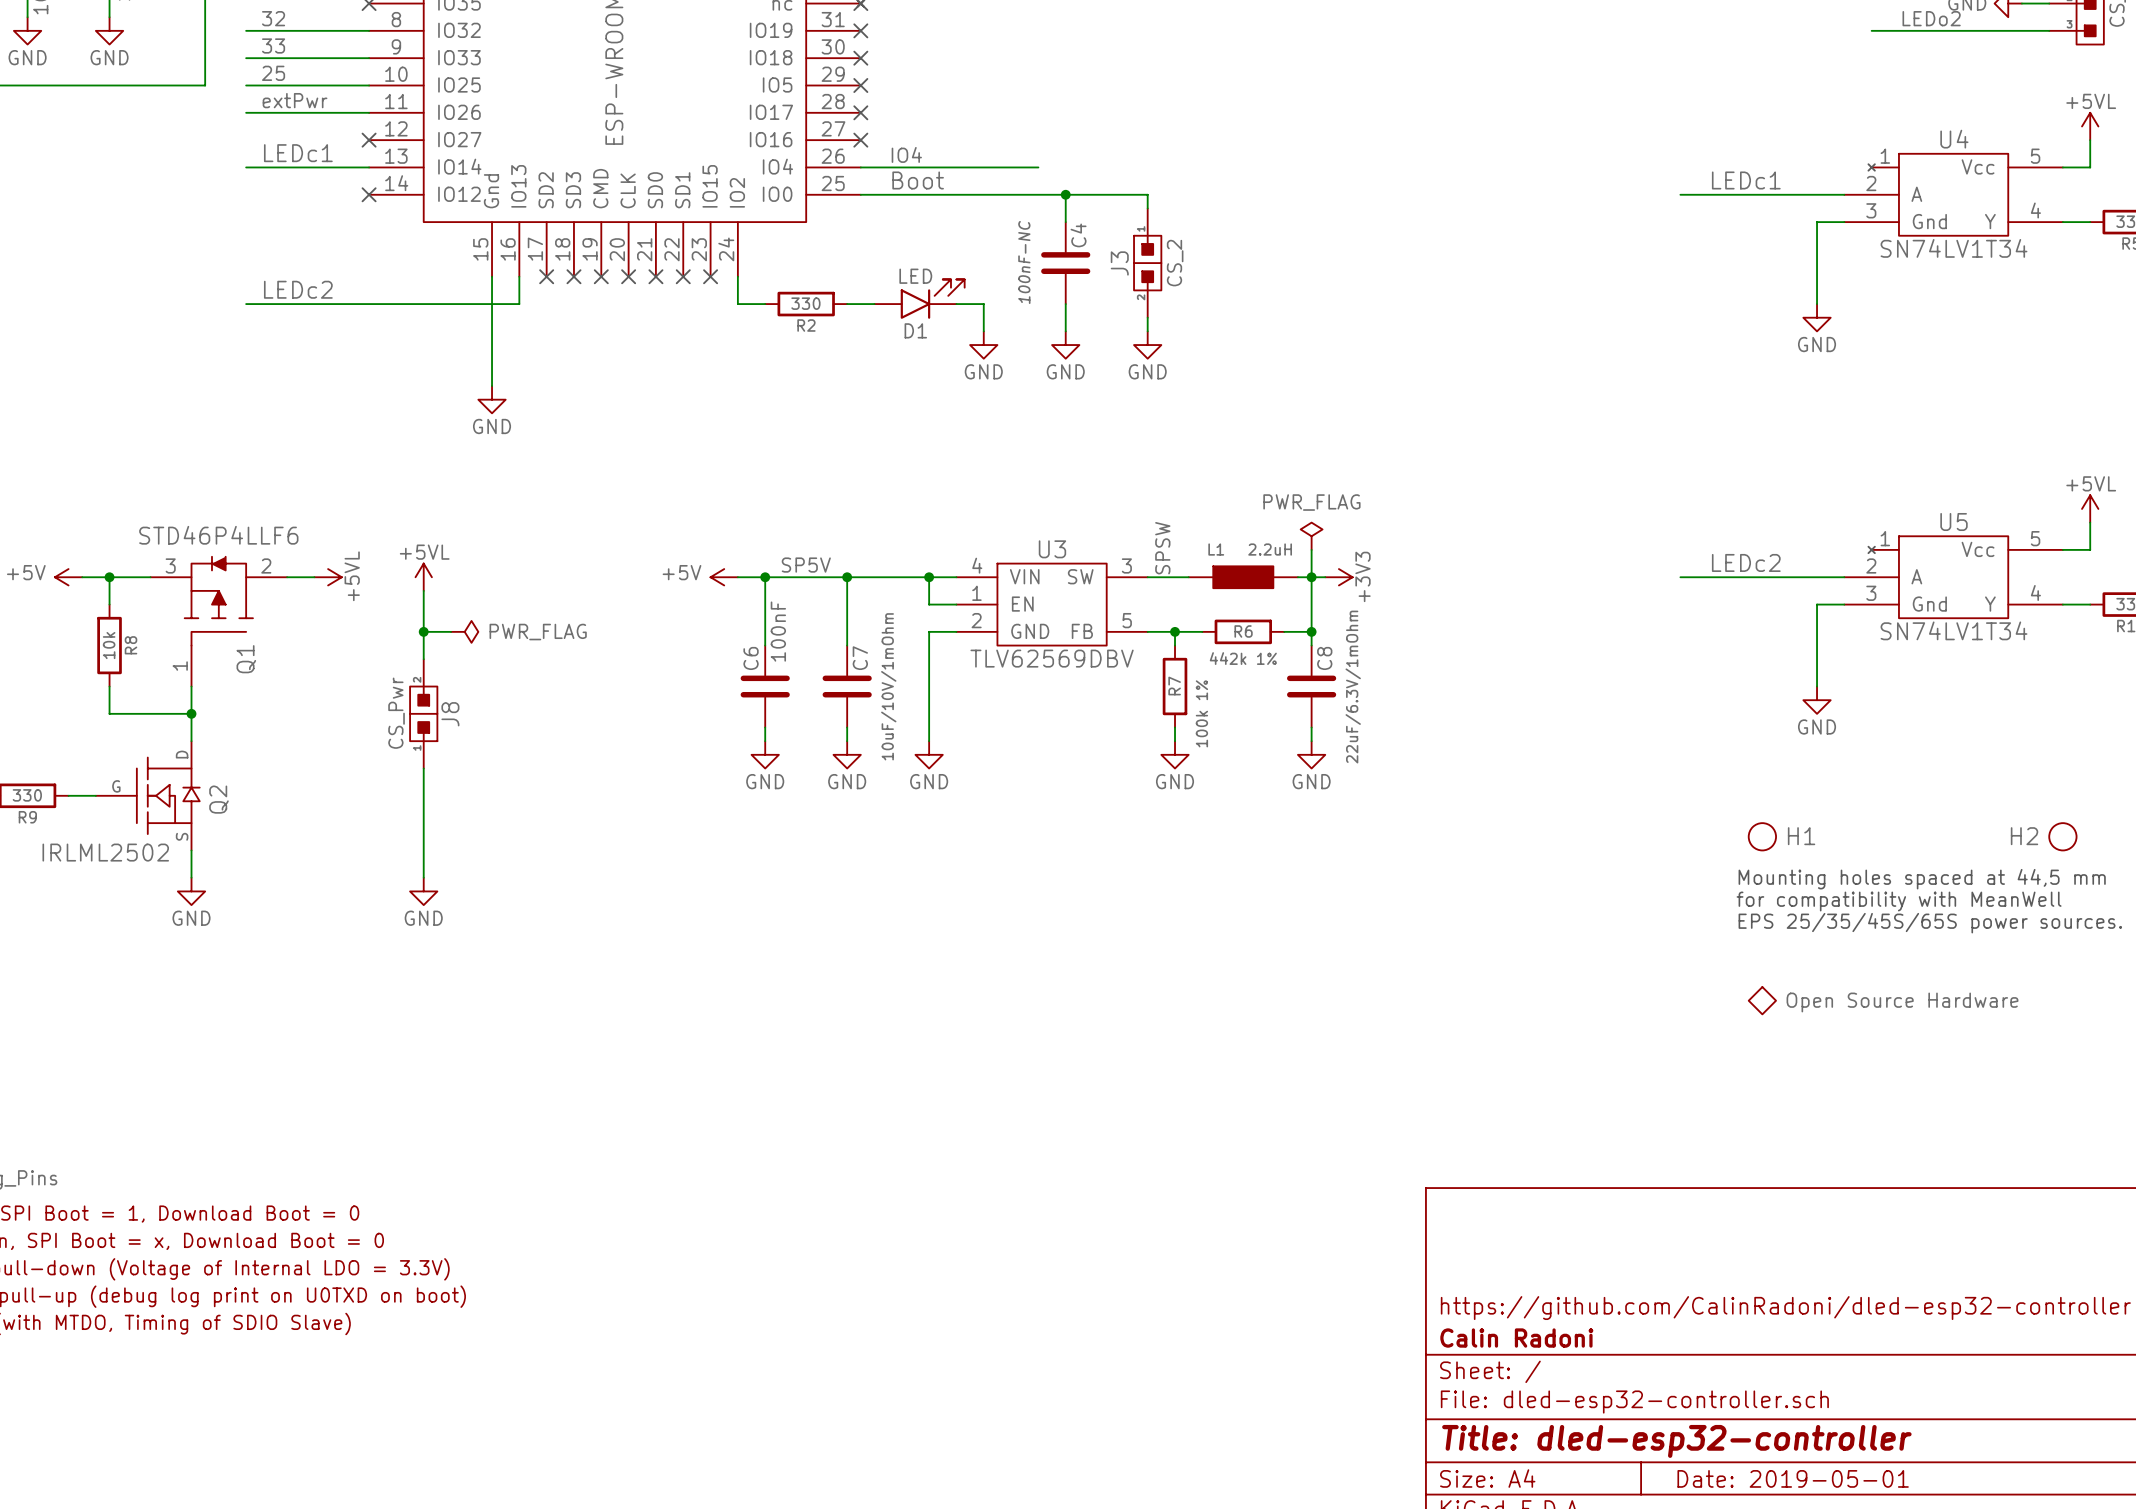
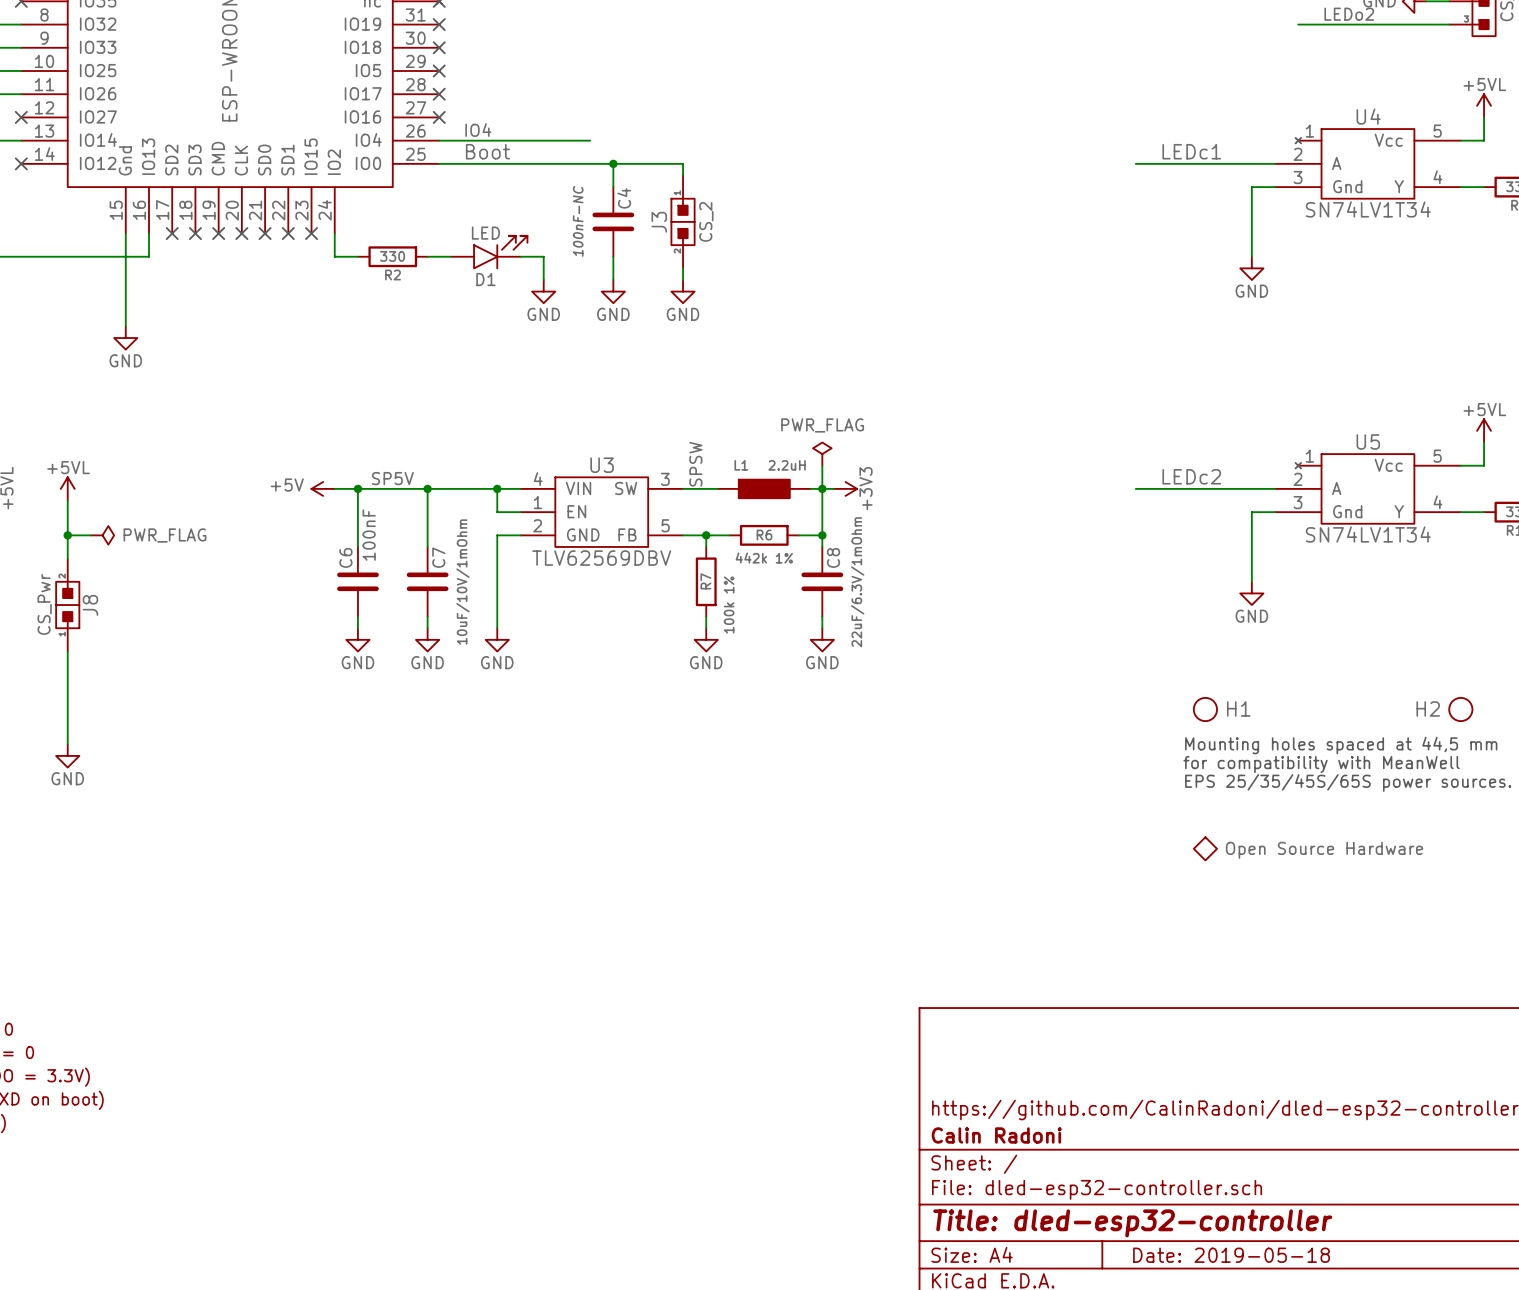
title block: Date: 2019-05-01 (1793, 1478) -> Date: 2019-05-18 (1231, 1255)

